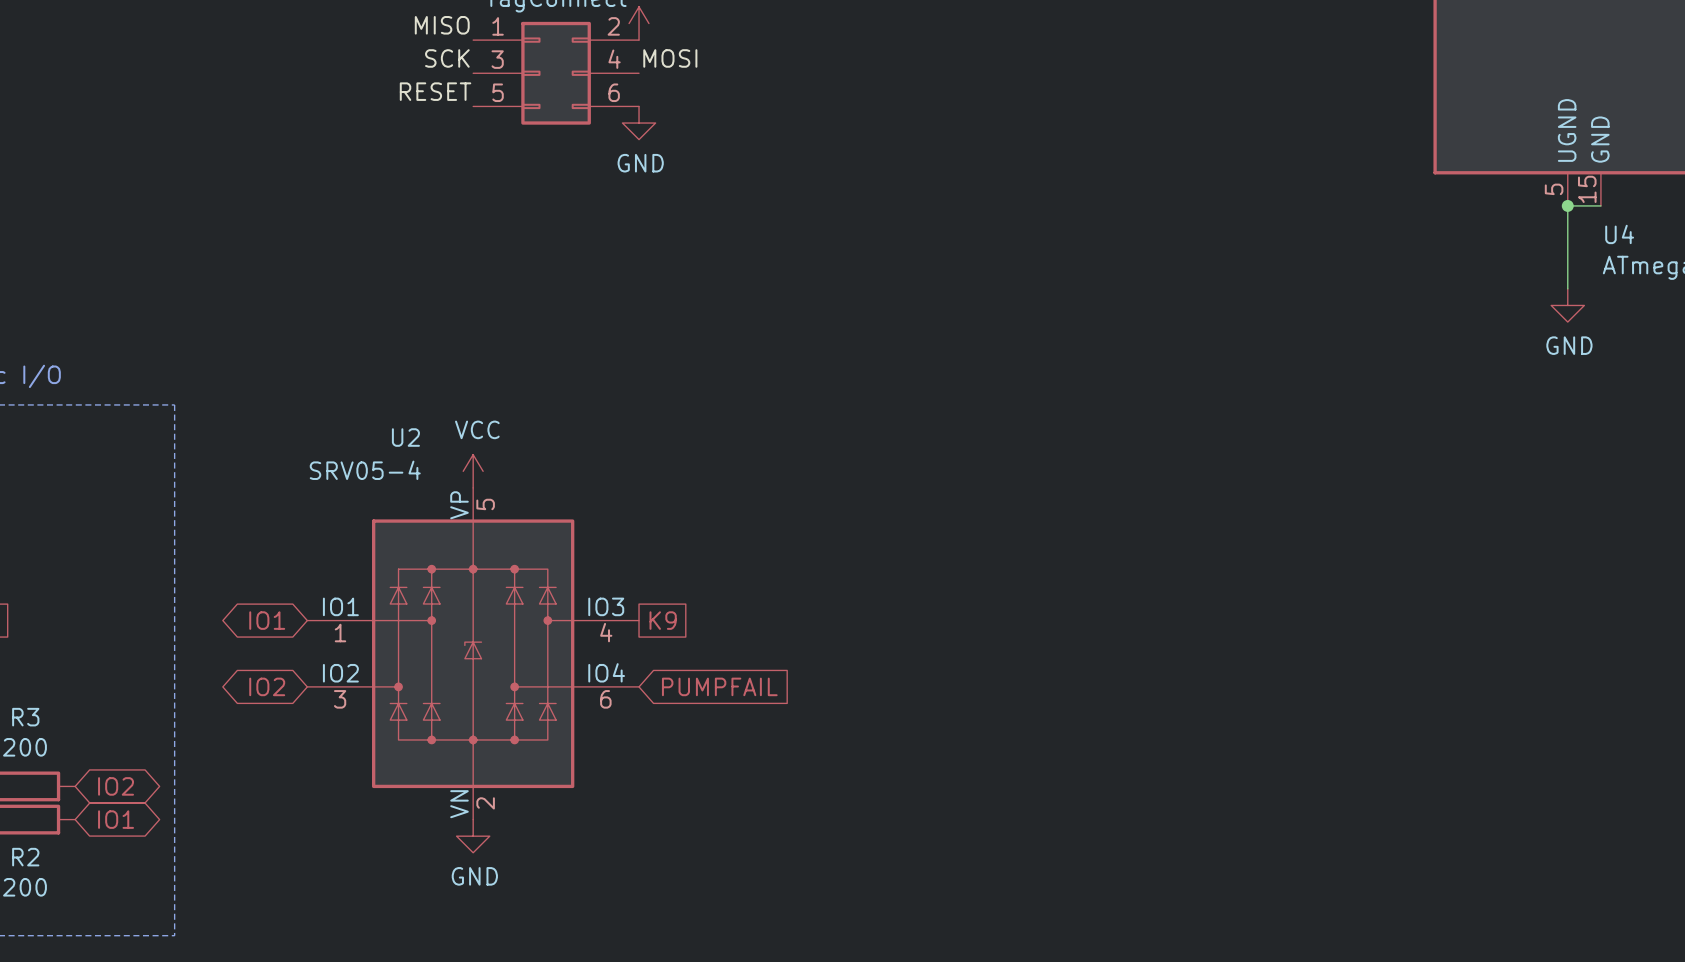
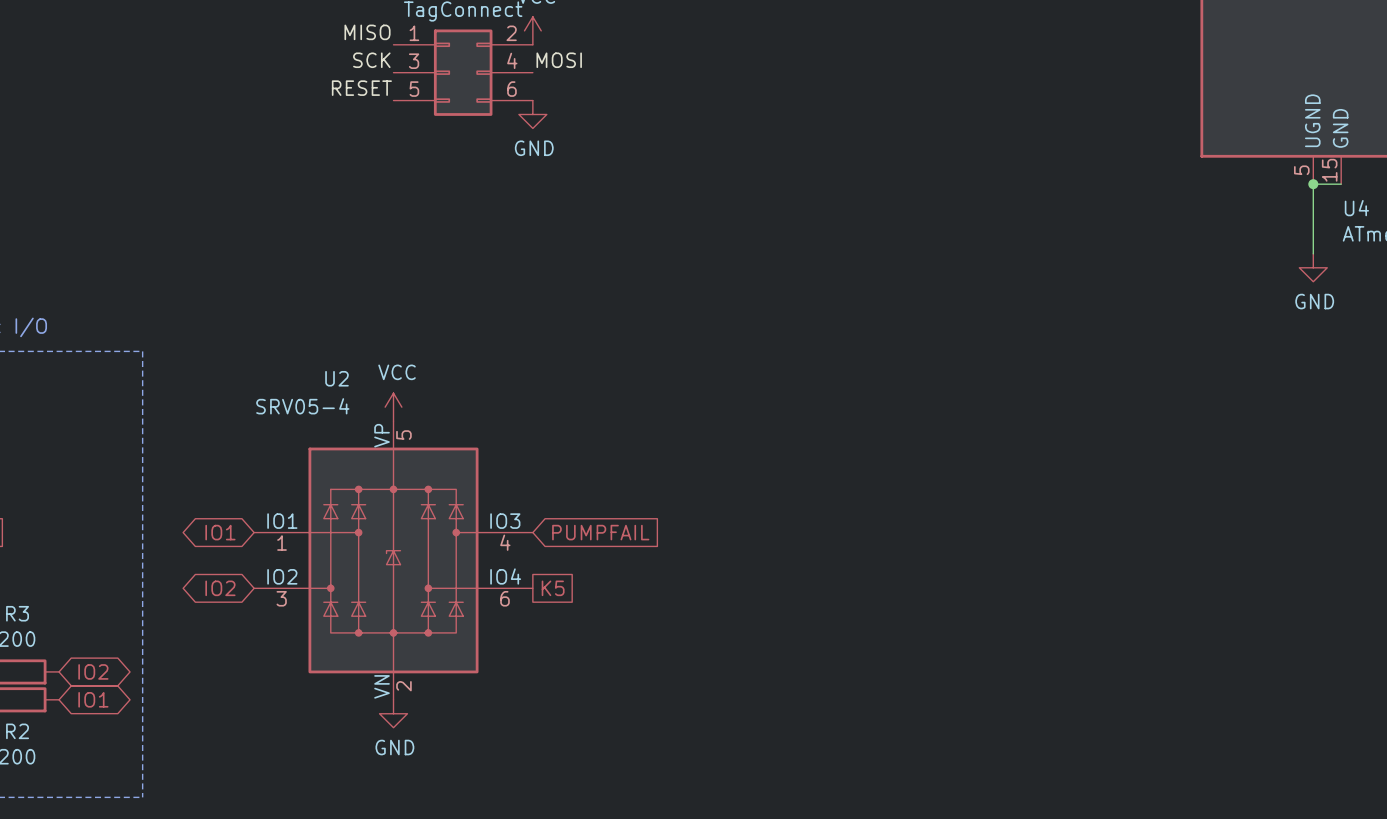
global label shape: passive (663, 620) -> input (600, 532)
global label: K9 (663, 620) -> PUMPFAIL (600, 532)
global label shape: input (719, 686) -> passive (553, 588)
global label: PUMPFAIL (719, 686) -> K5 (553, 588)

